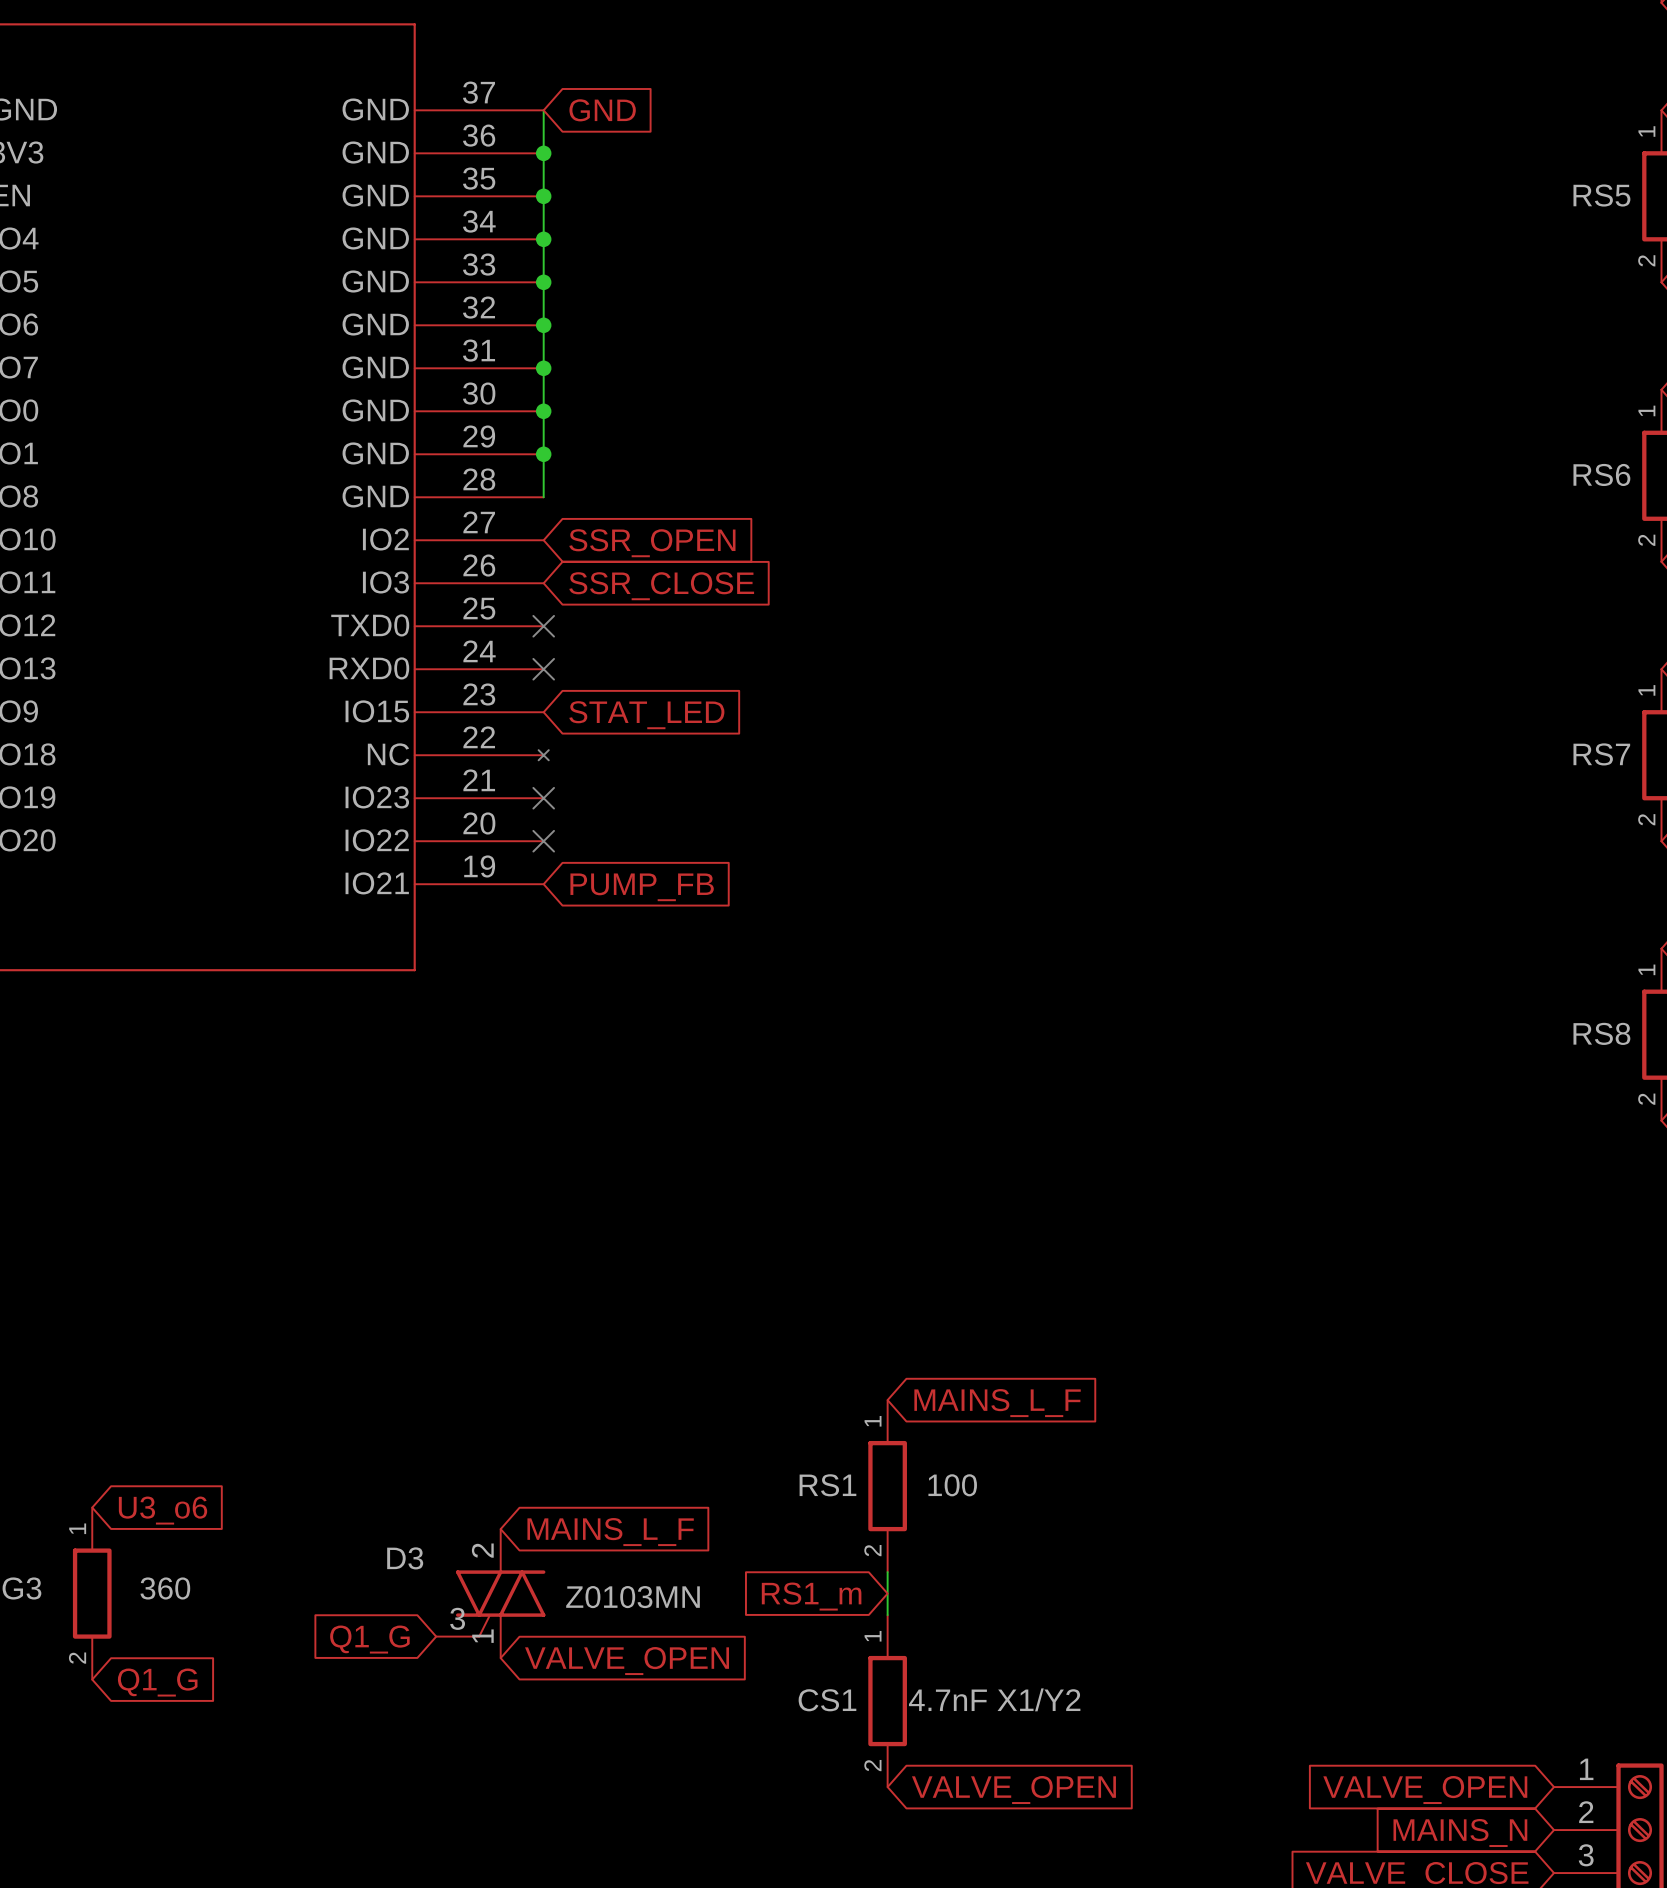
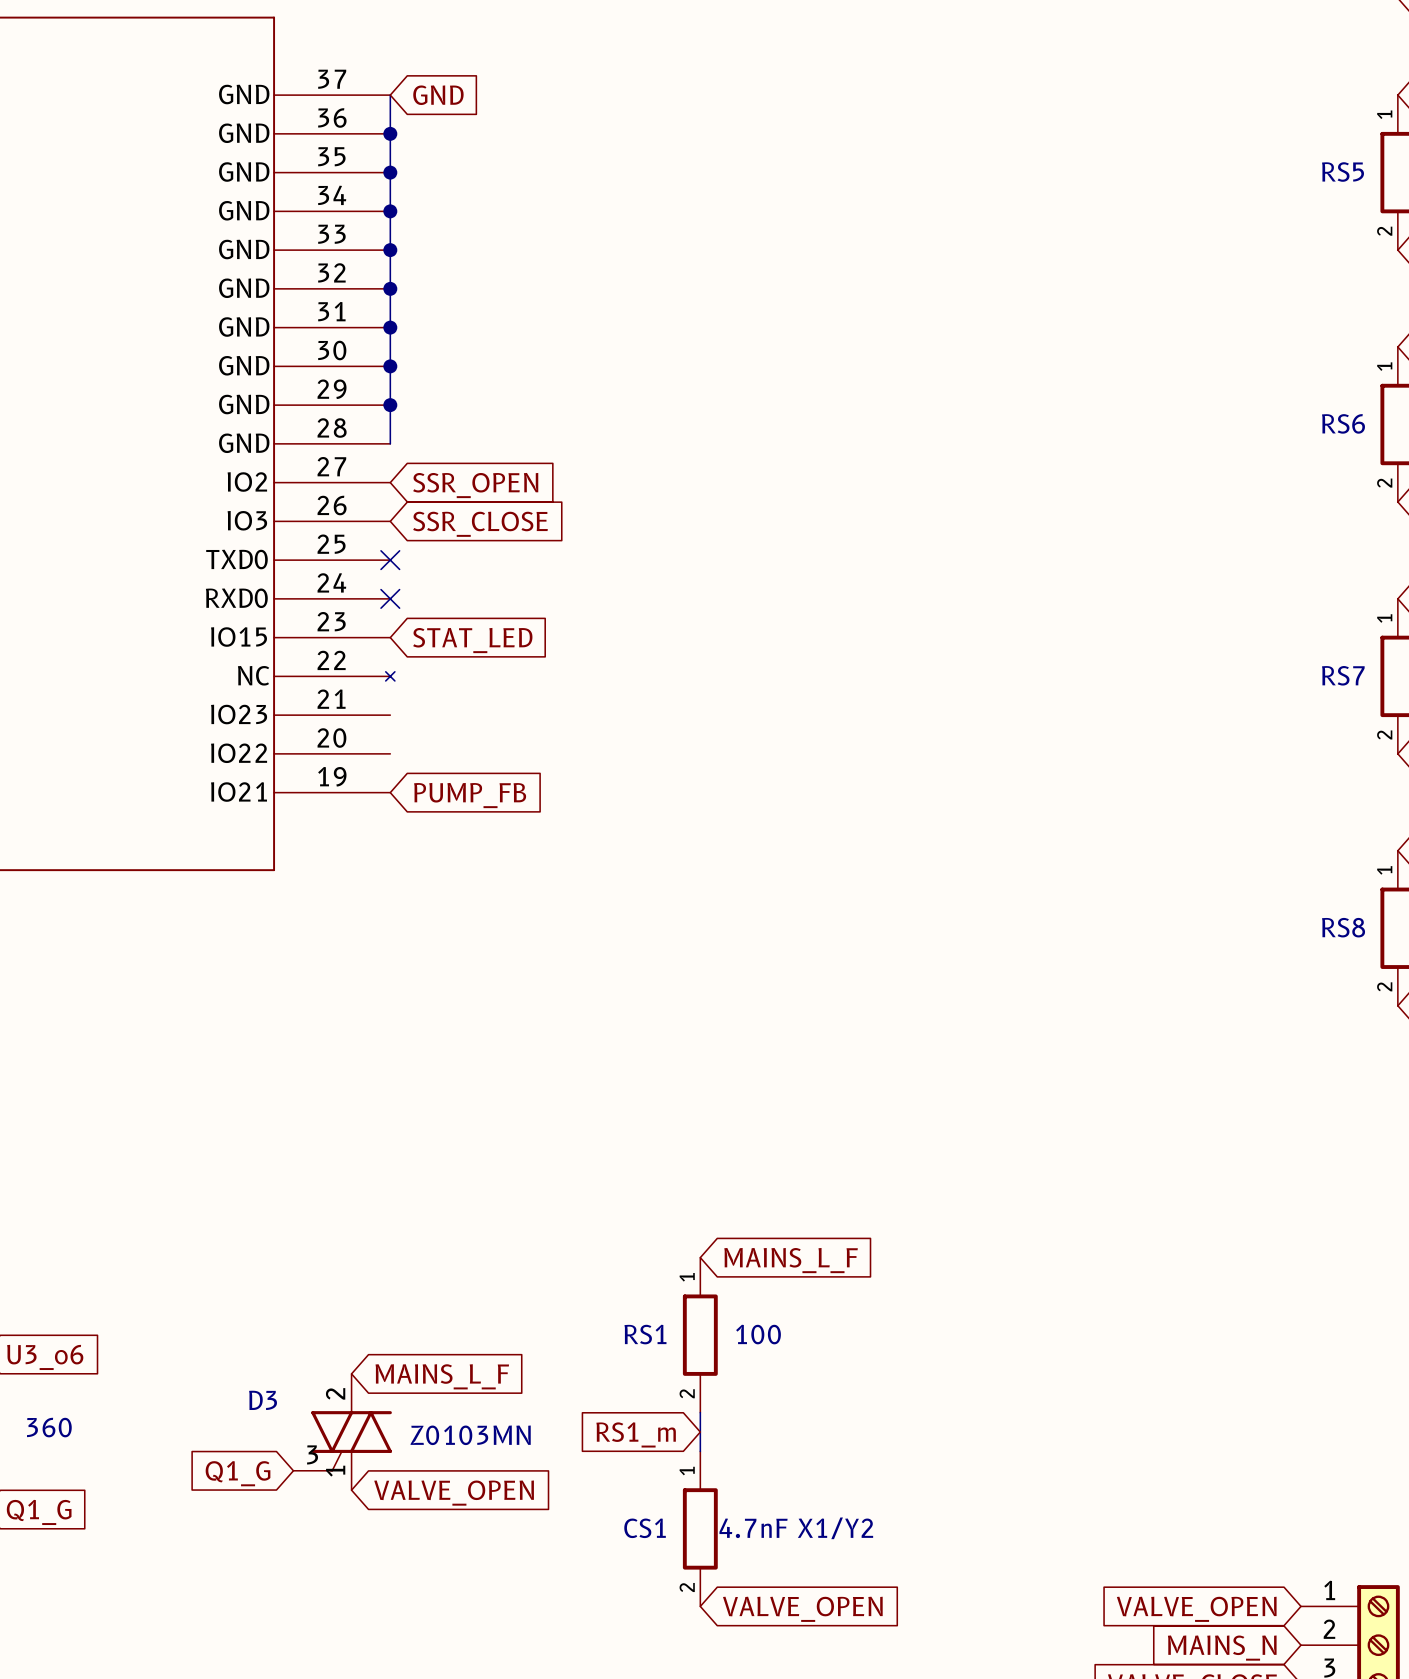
no-connect mark: (543, 798) -> none
no-connect mark: (543, 841) -> none

